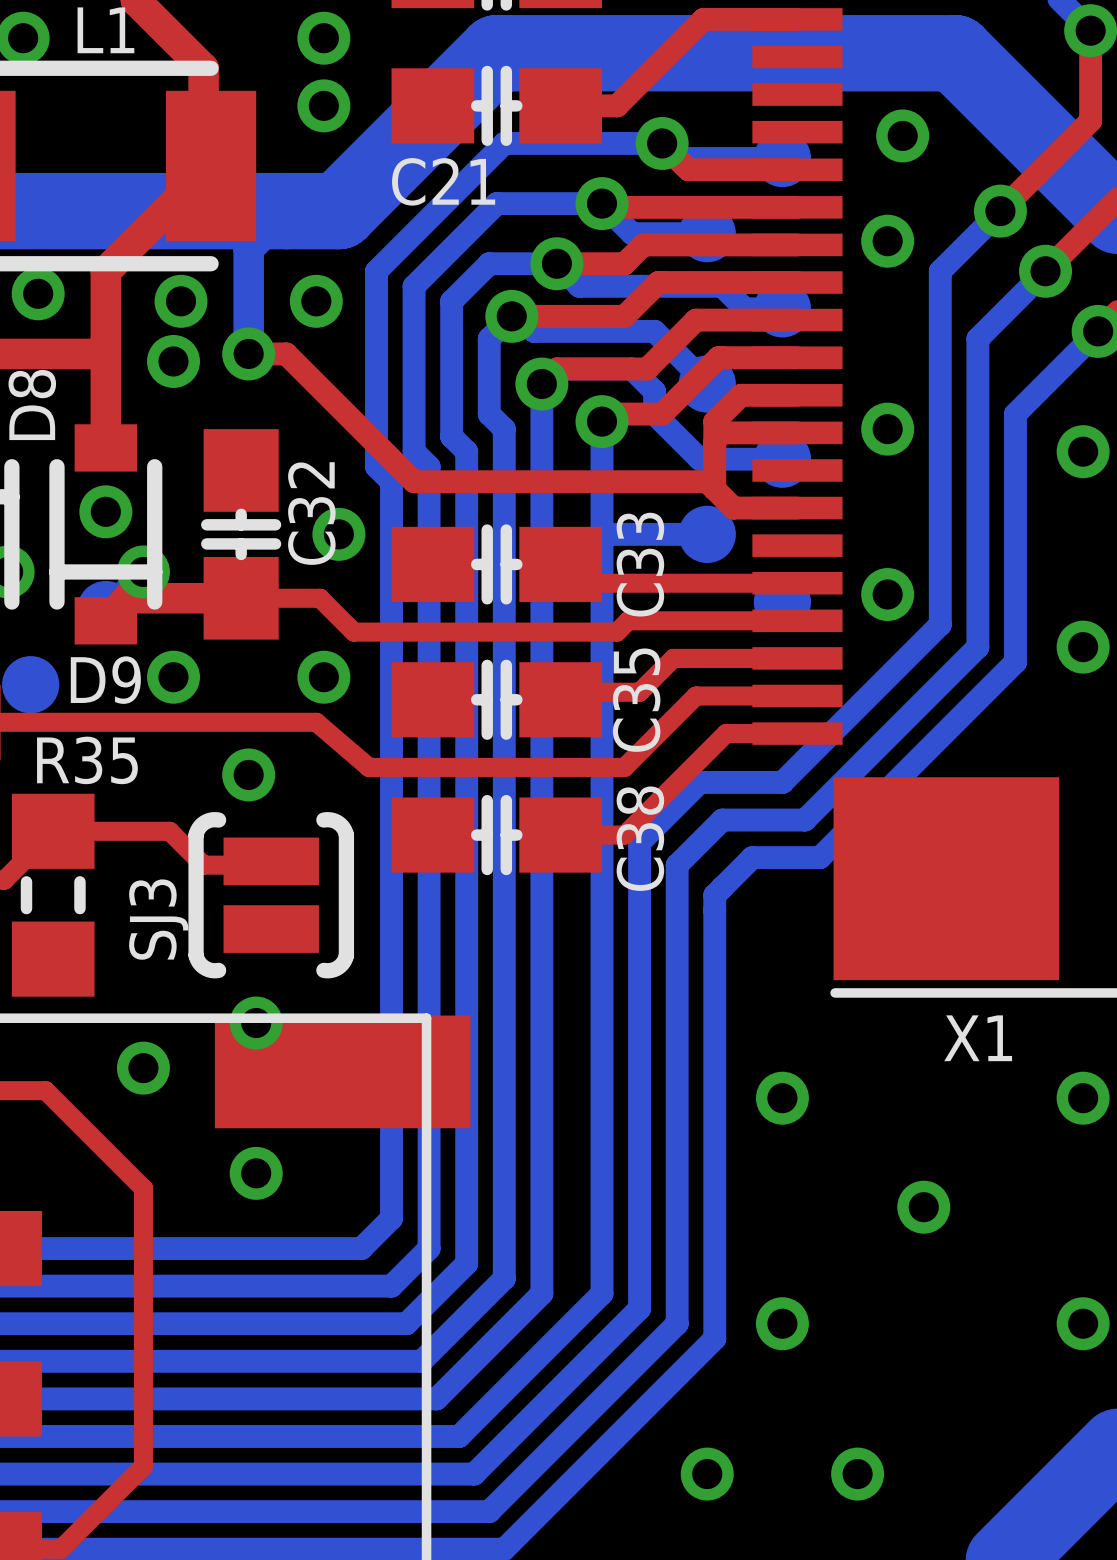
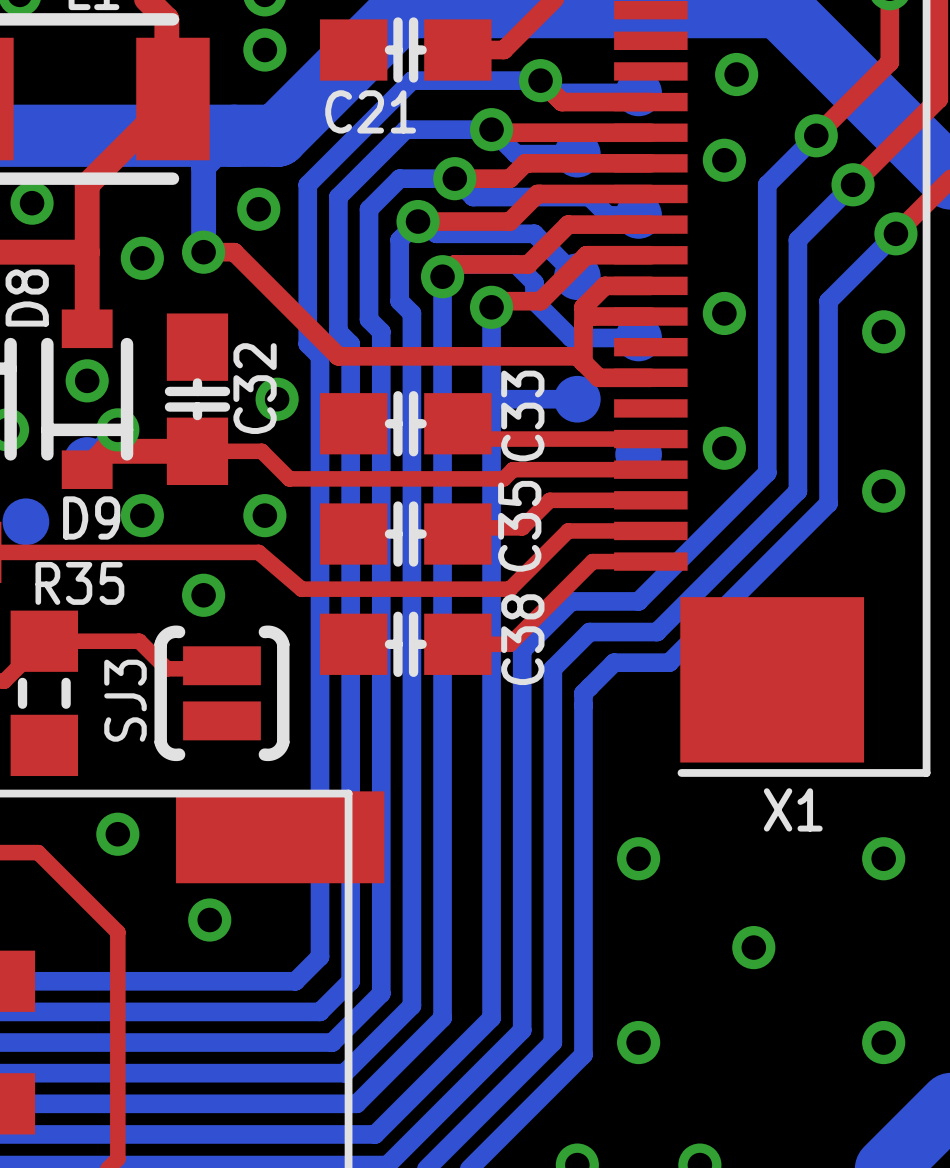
via: (181, 301) -> none
via: (256, 1023) -> none

